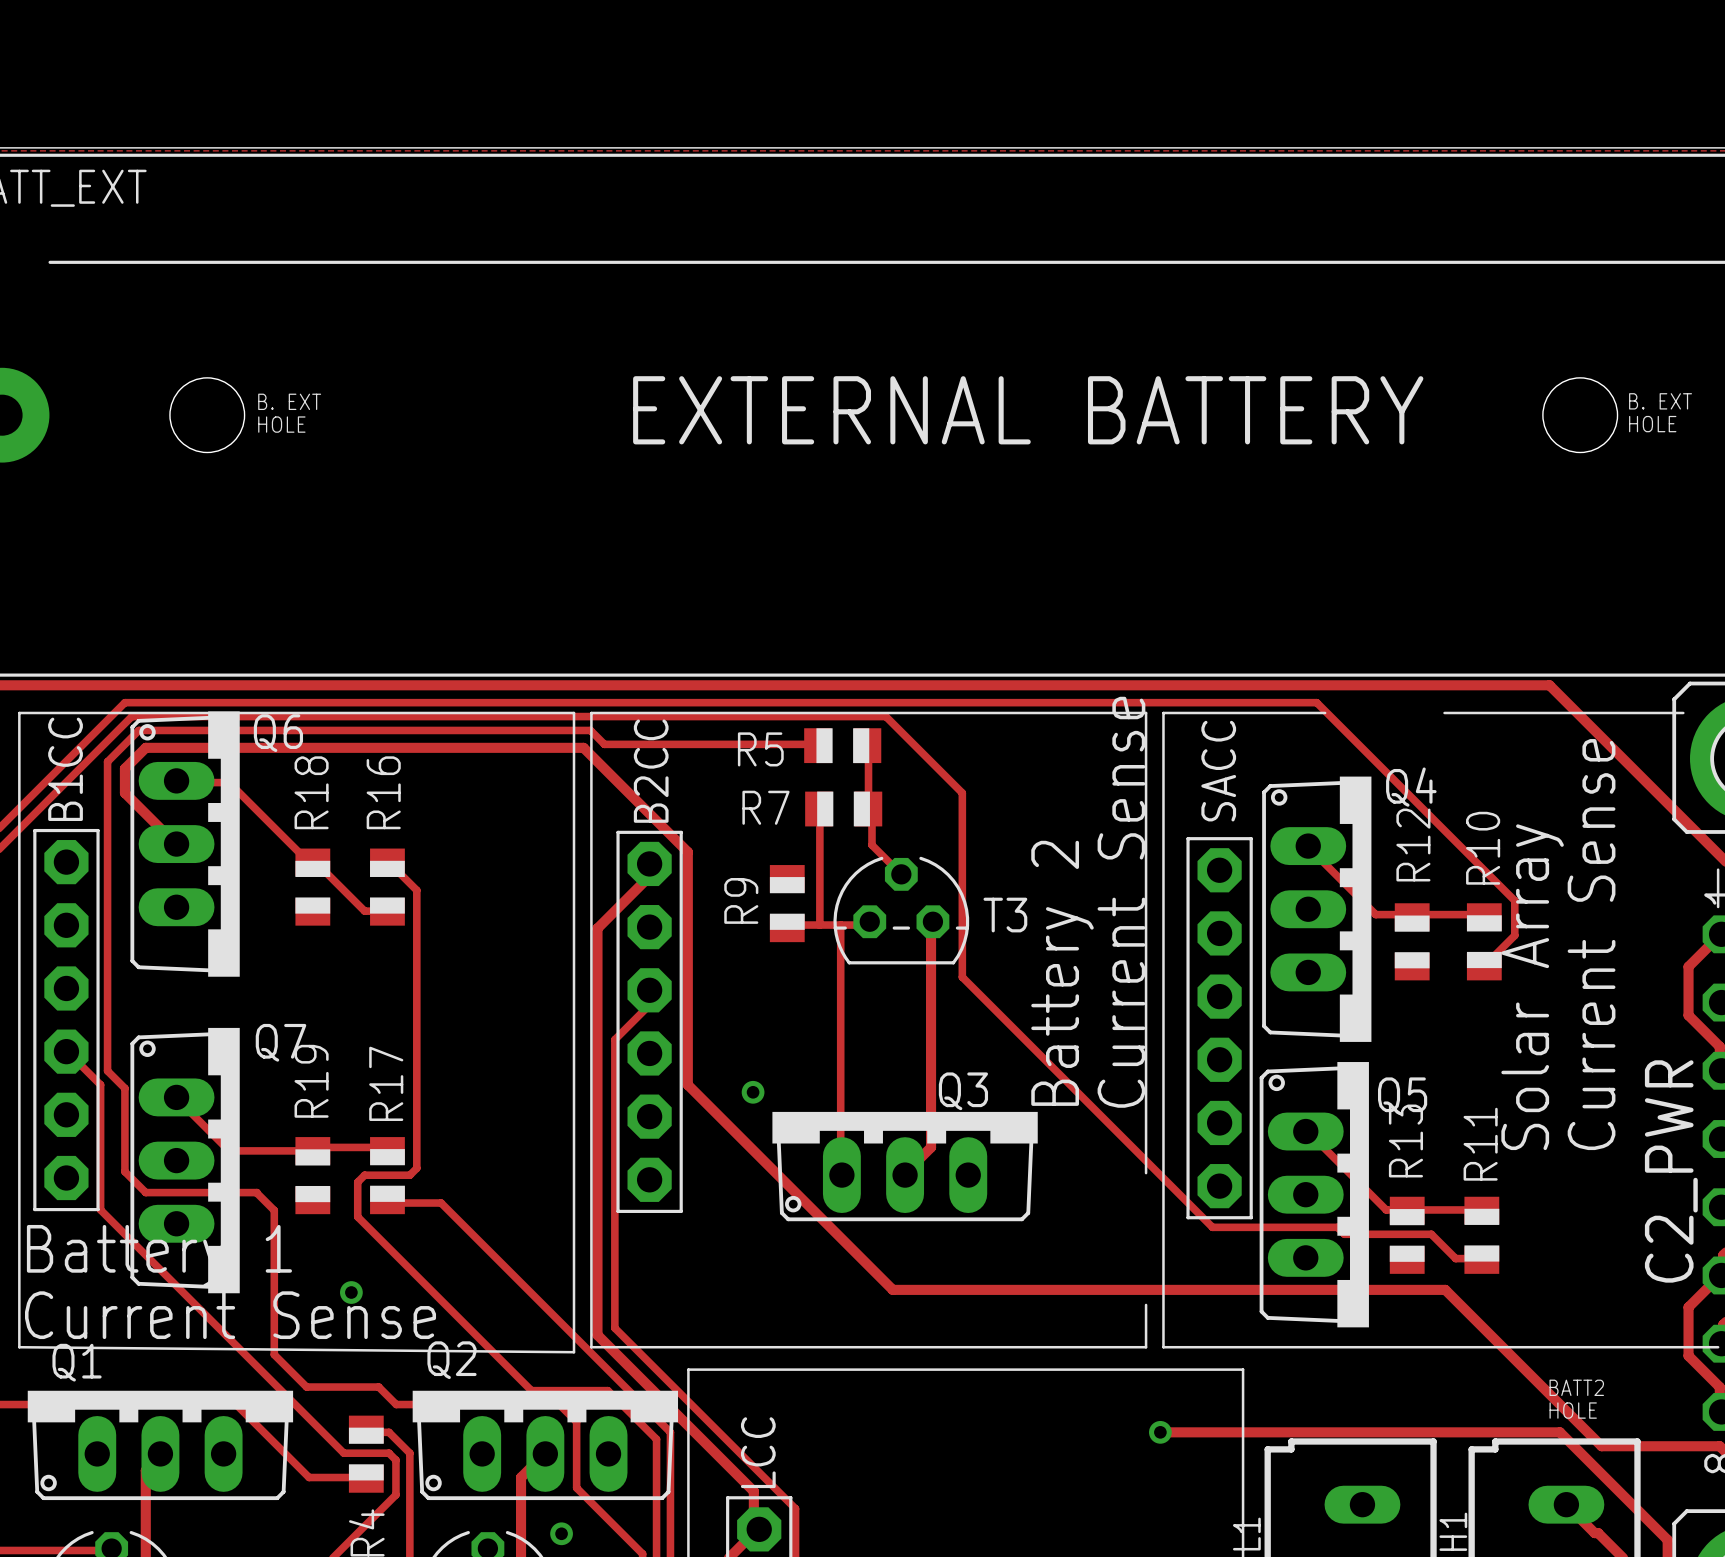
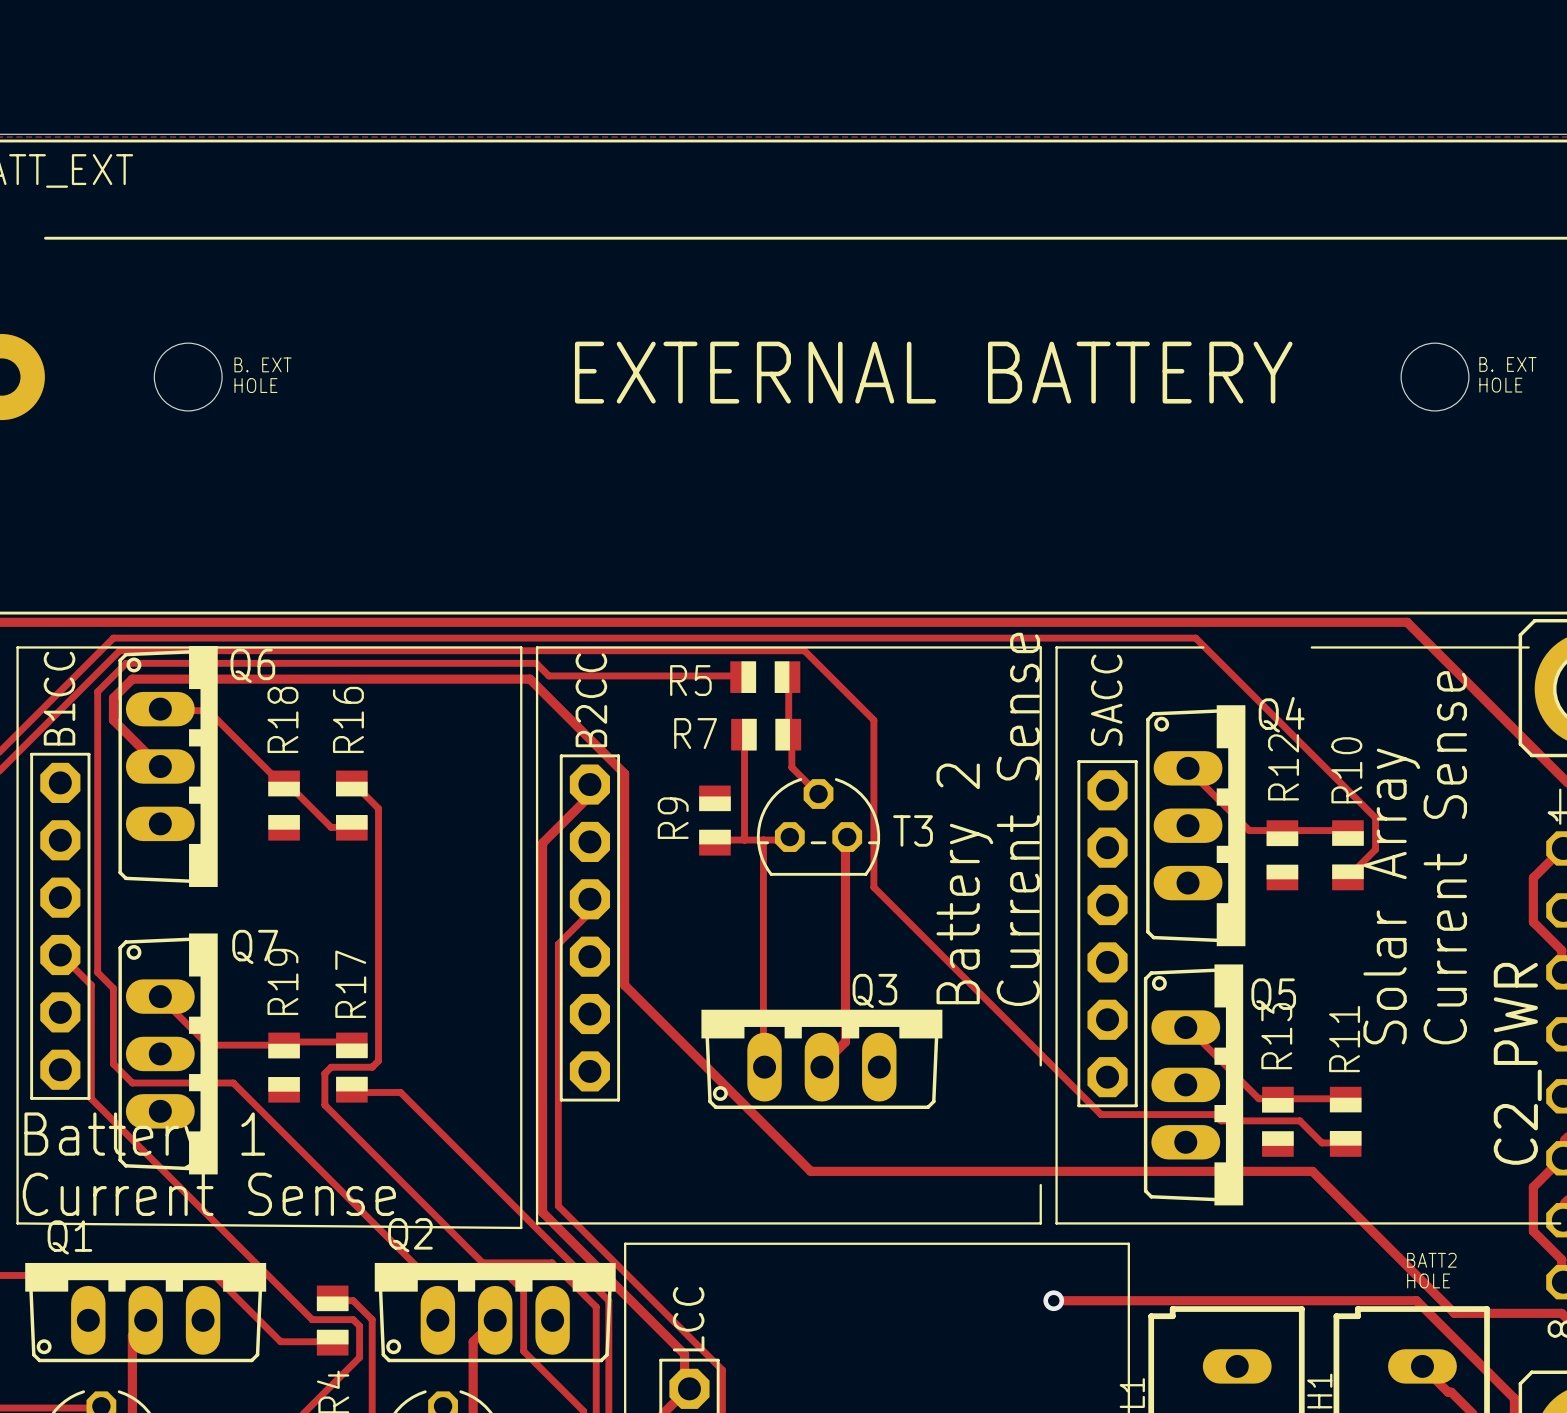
via: (753, 1092) -> none
track: (256, 1192) (274, 1210) (274, 1354) (306, 1387) (378, 1387) (396, 1404) (468, 1404) -> (233, 1083) (425, 1275)
via: (351, 1292) -> none
via: (561, 1533) -> none

